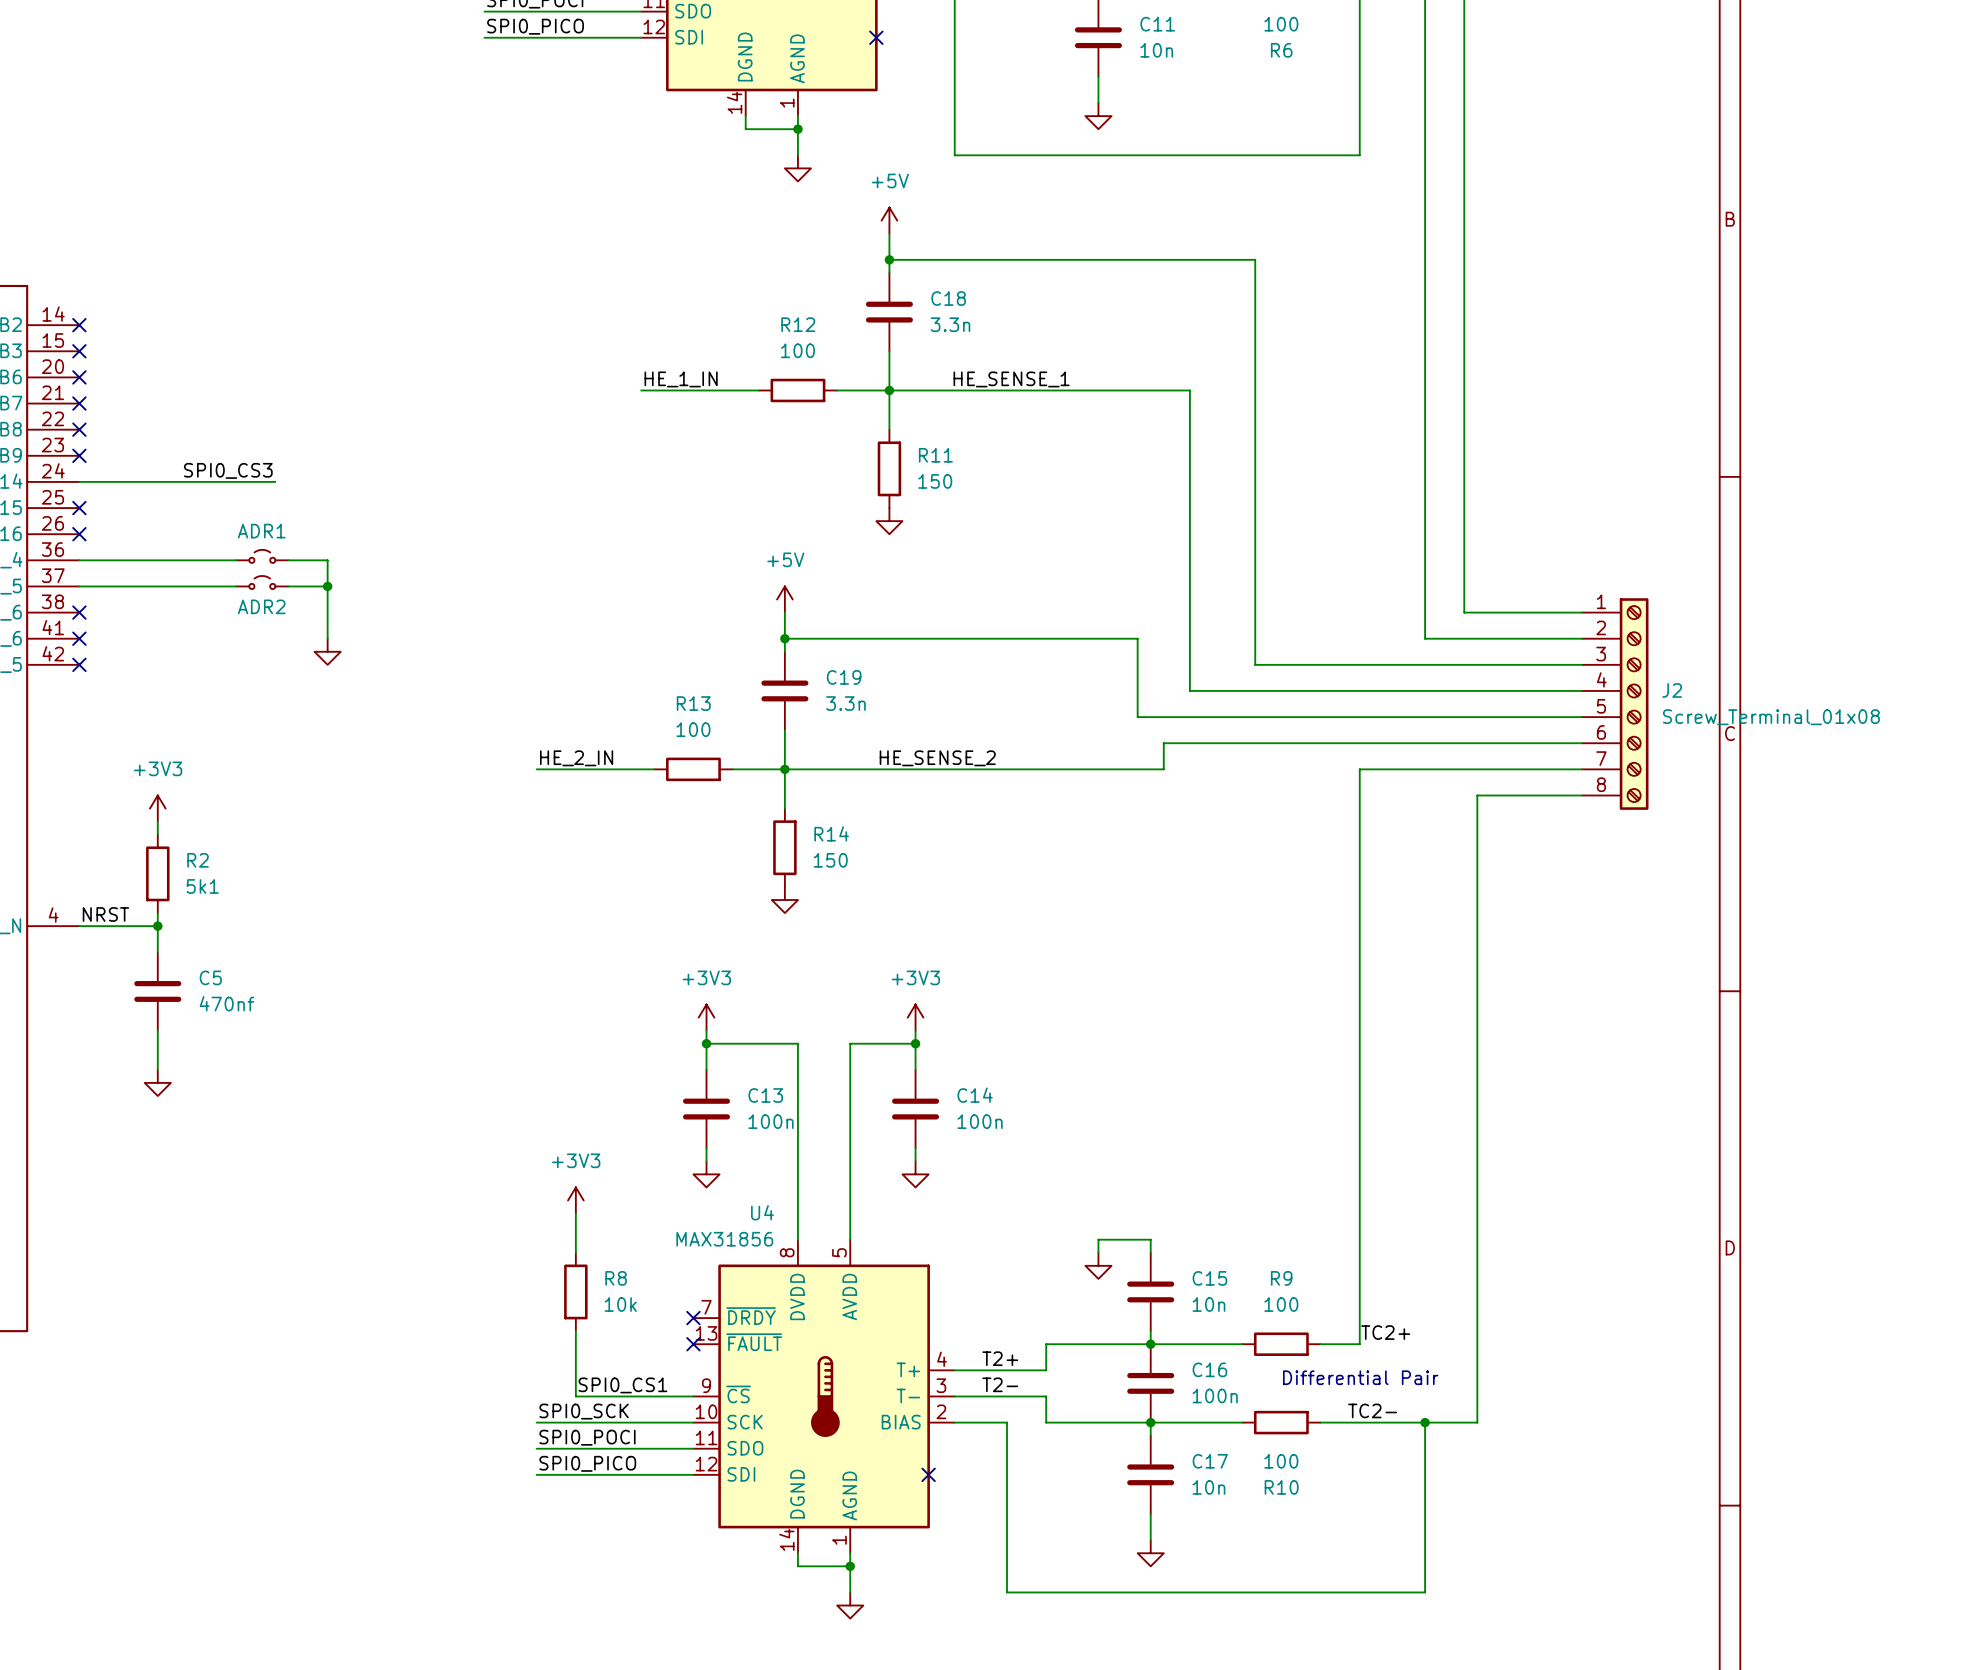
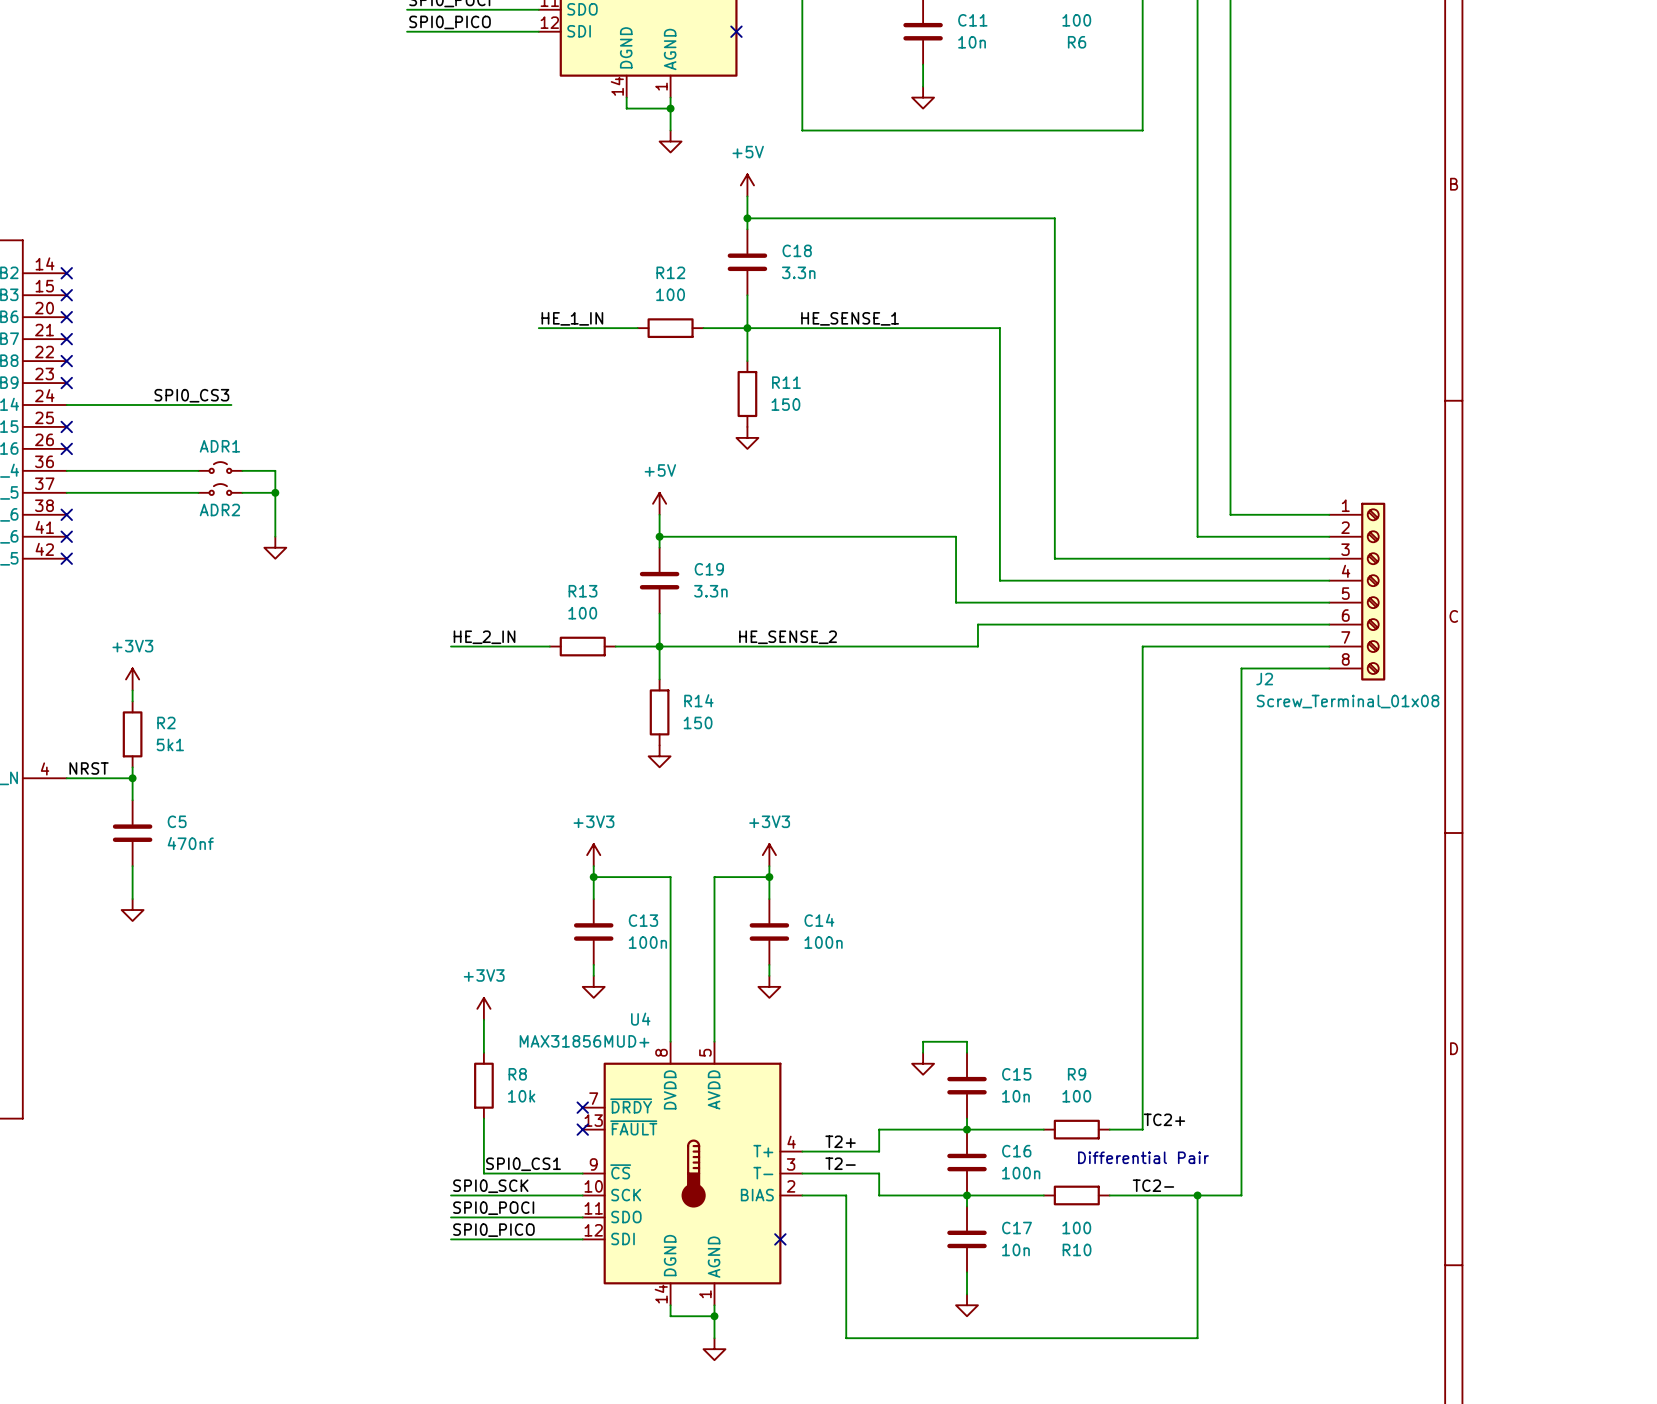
J2 name position: J2 (1672, 690) -> J2 (1264, 679)
J2 value position: Screw_Terminal_01x08 (1771, 717) -> Screw_Terminal_01x08 (1348, 701)
U4 value: MAX31856 (724, 1239) -> MAX31856MUD+ (584, 1041)

